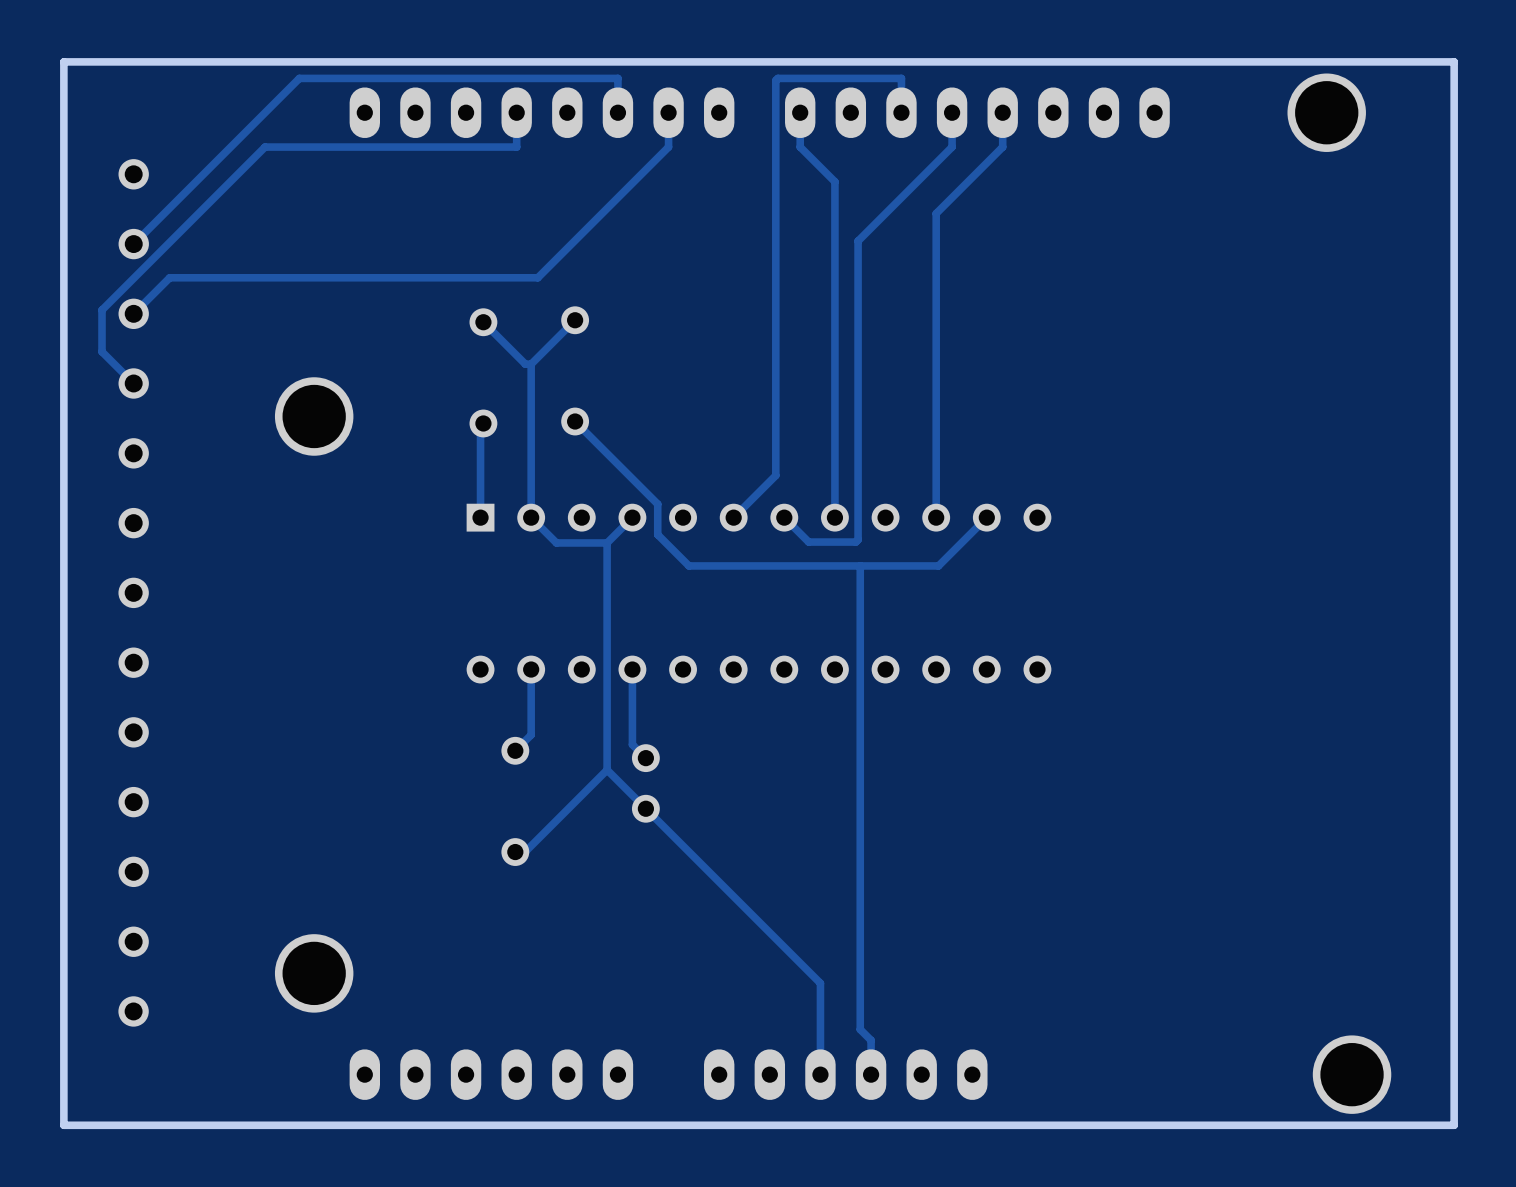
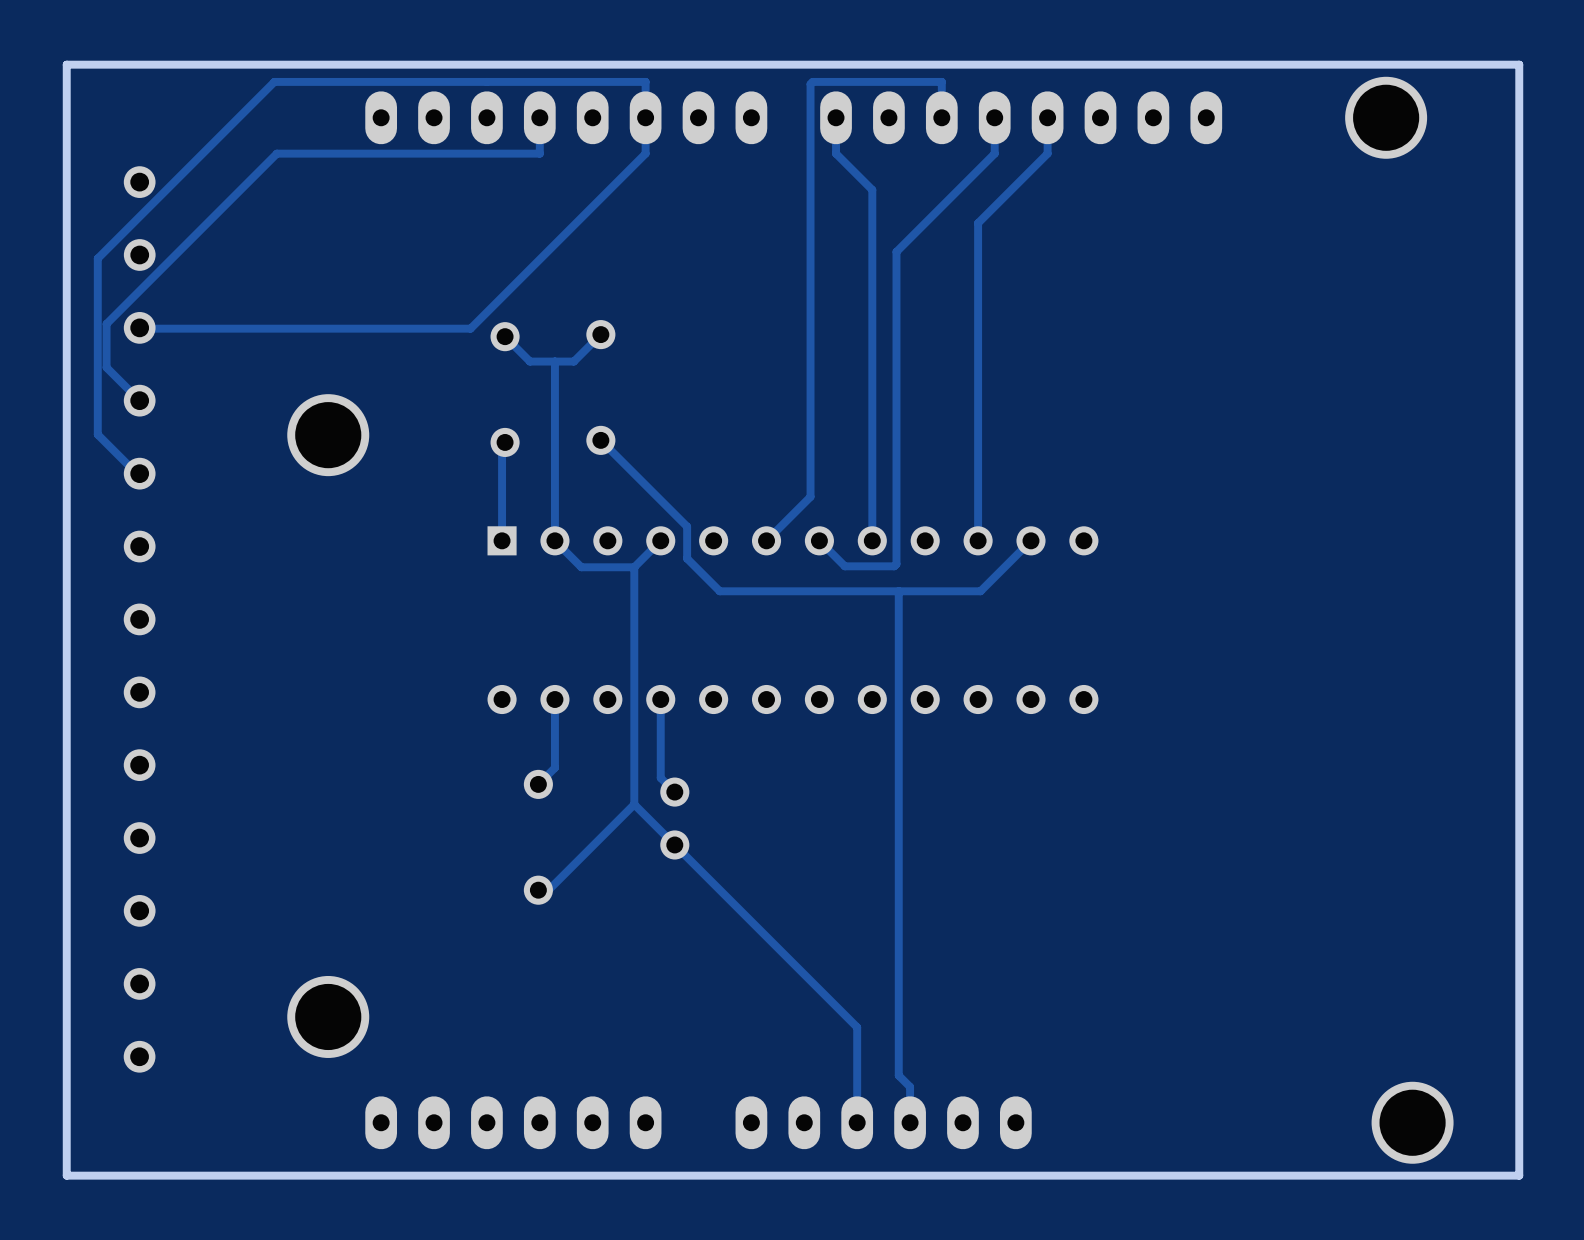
track: (299, 78) (133, 244) -> (312, 81) (274, 81) (97, 258) (97, 434) (137, 474)
track: none -> (645, 117) (645, 153) (470, 328) (137, 328)
track: (668, 112) (668, 147) (537, 277) (169, 277) (133, 313) -> none
track: none -> (554, 361) (554, 380)
track: (549, 346) (531, 364) (525, 364) (507, 346) -> (573, 361) (529, 361)

